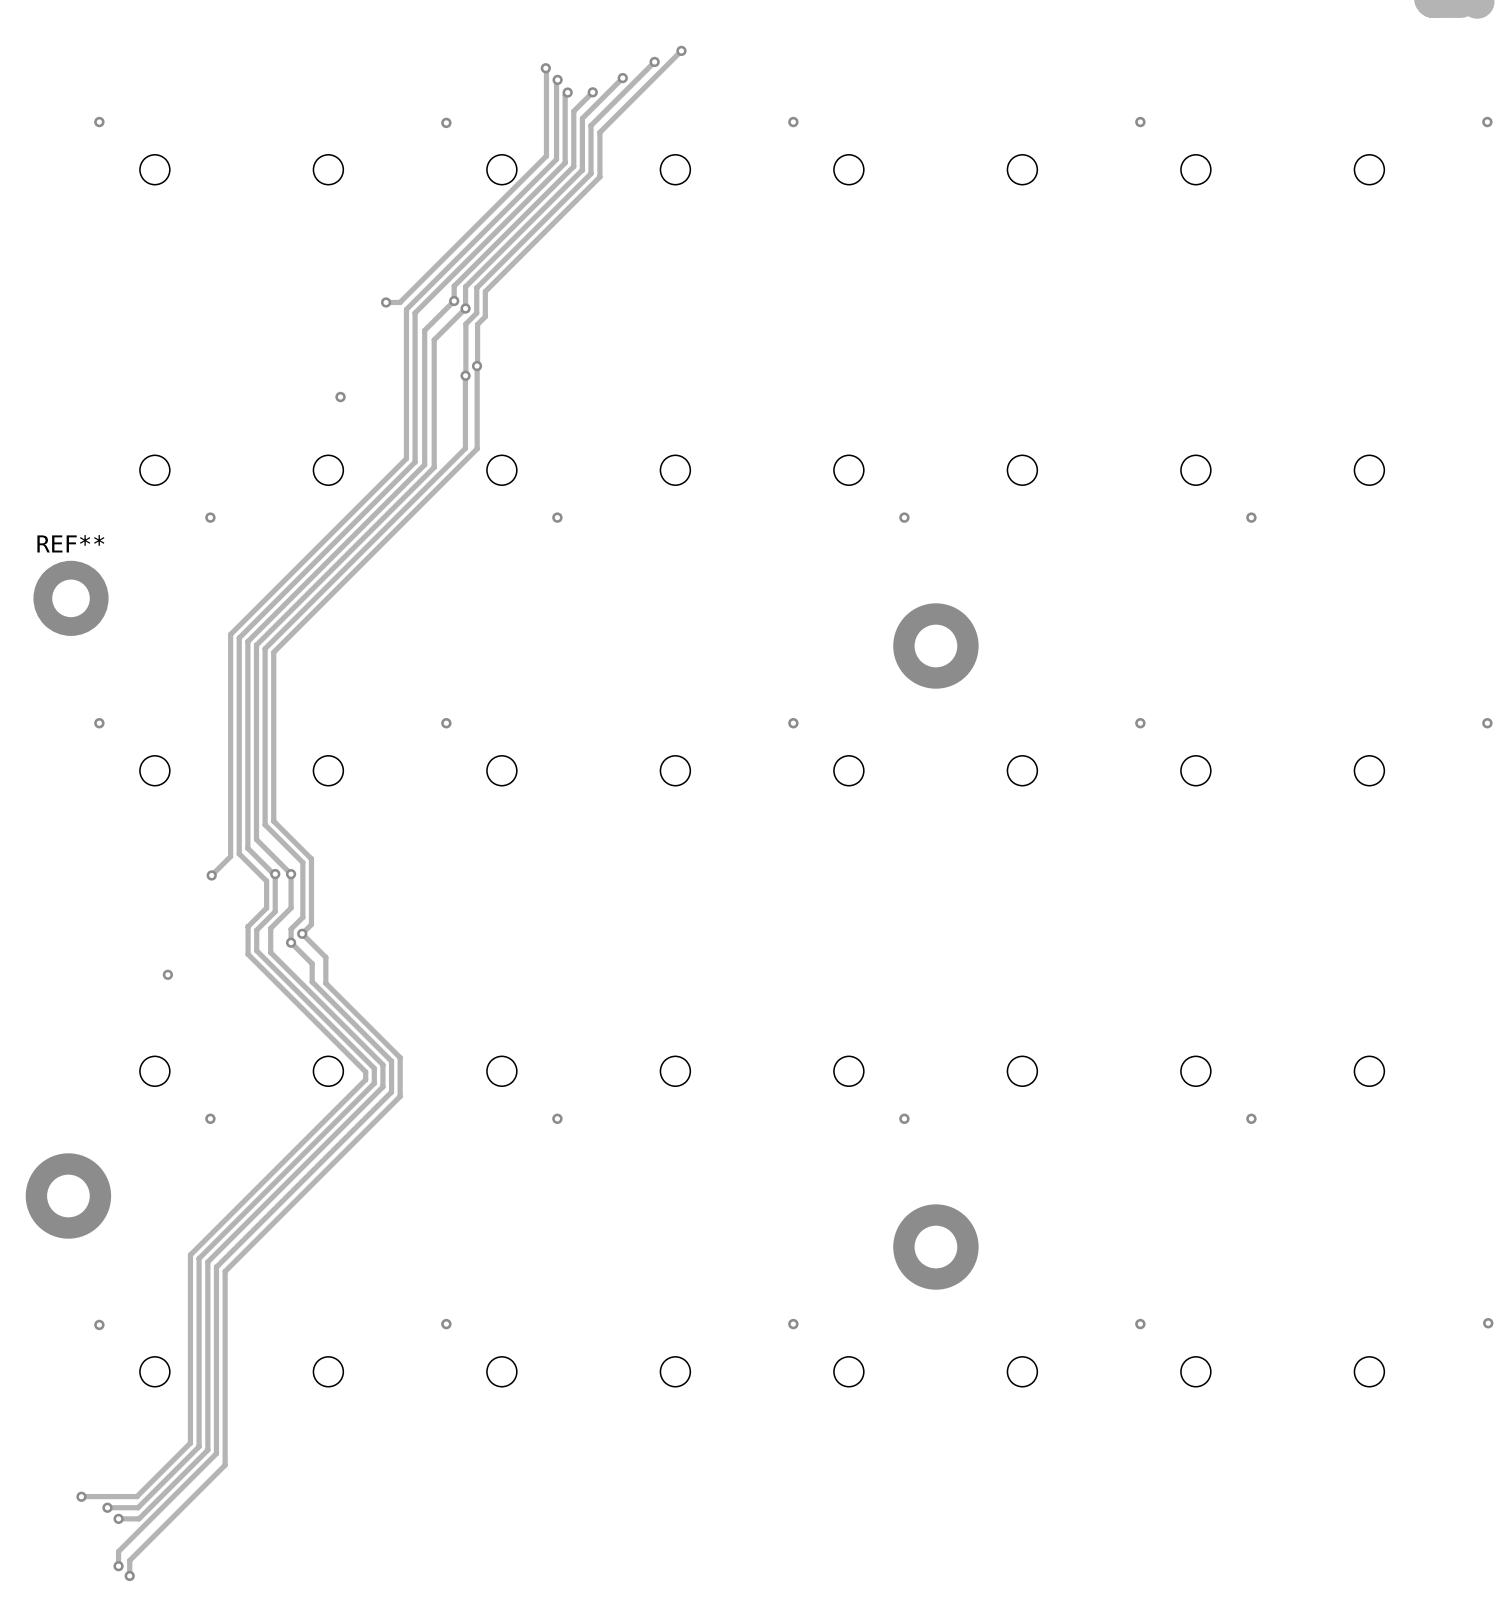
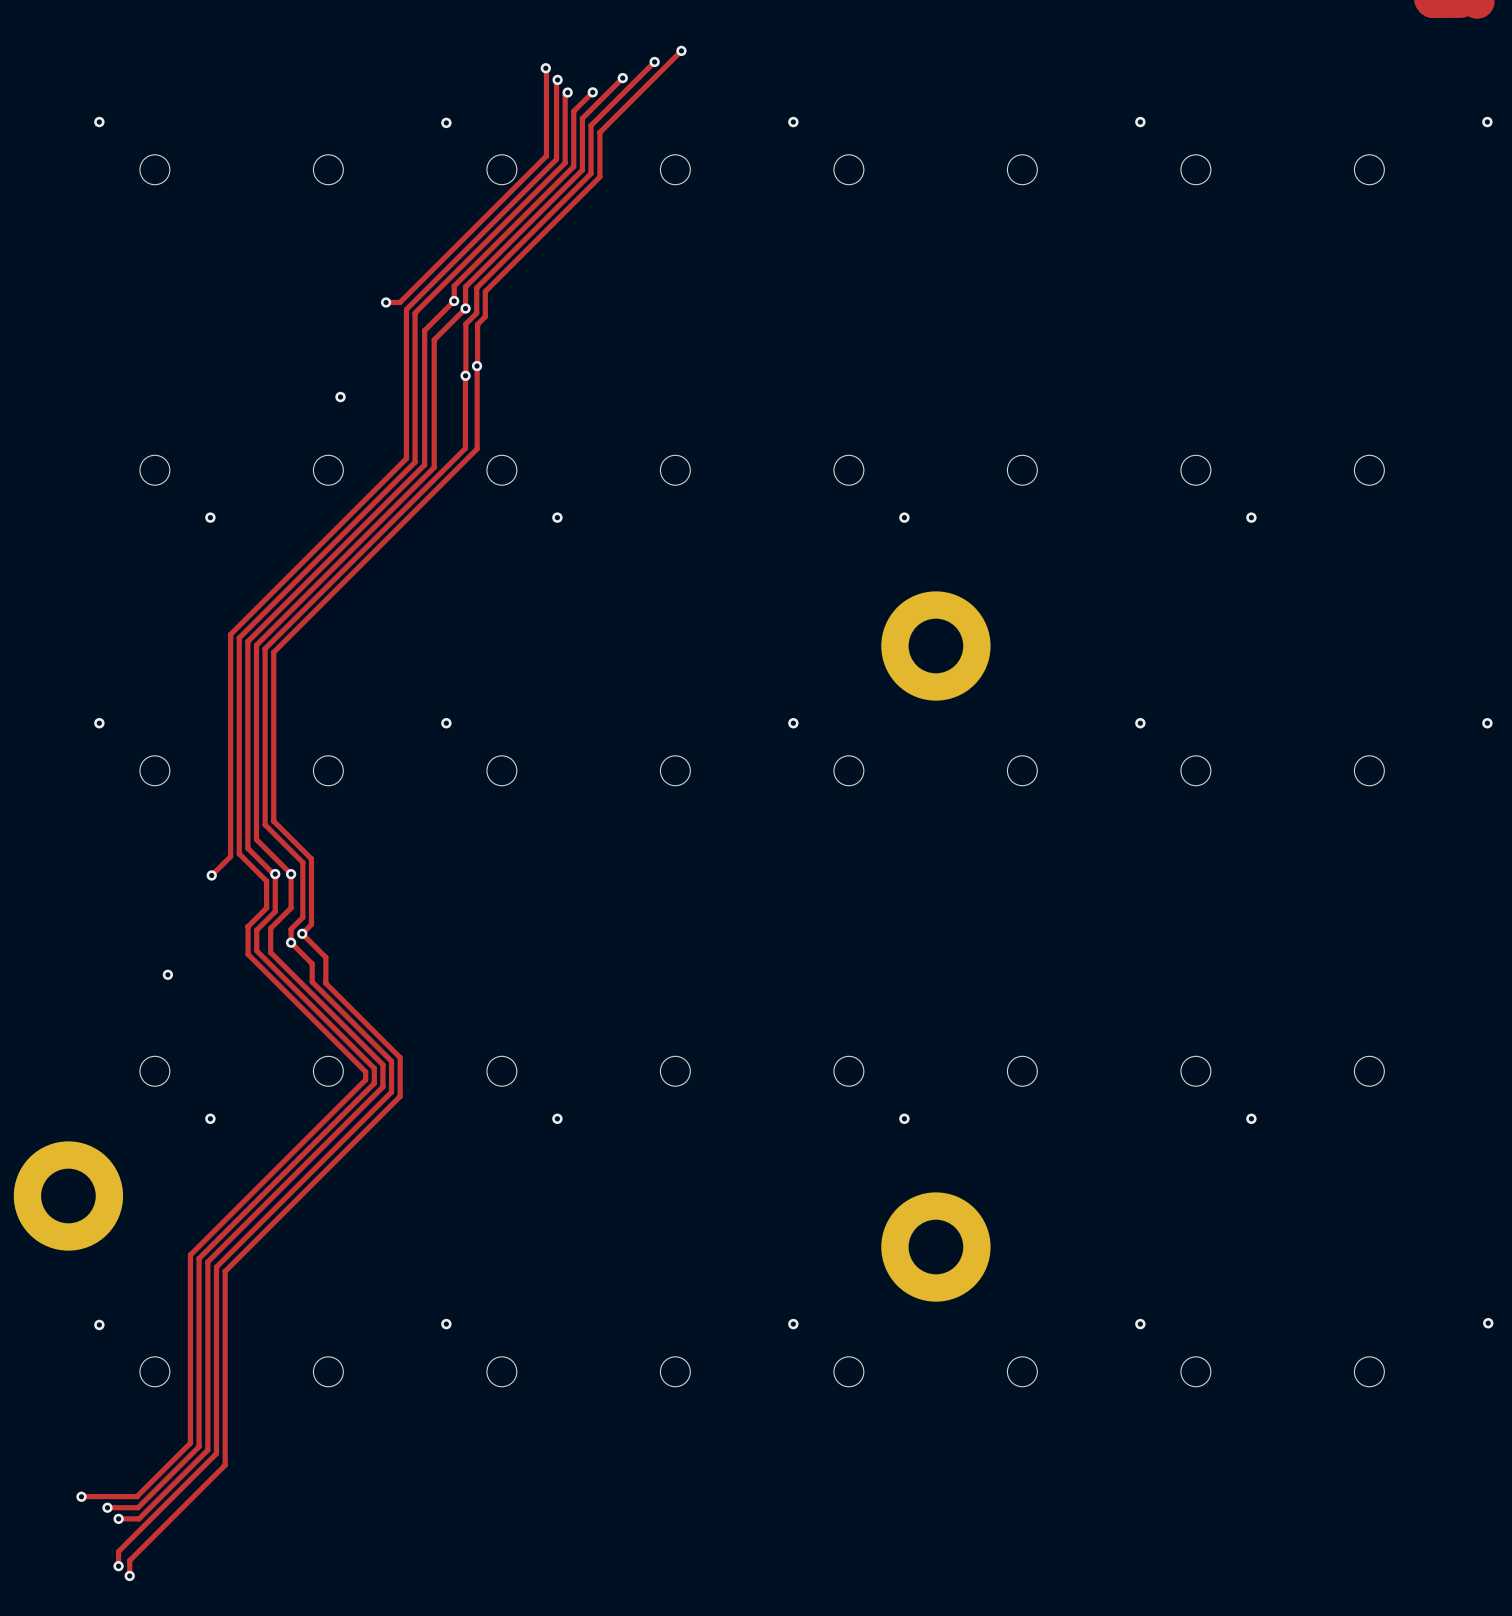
REF**: (71, 598) -> none
part footprint: [893, 603, 979, 689] -> [881, 591, 991, 701]
part footprint: [25, 1153, 112, 1239] -> [13, 1141, 124, 1251]
part footprint: [893, 1204, 979, 1290] -> [881, 1192, 991, 1302]

